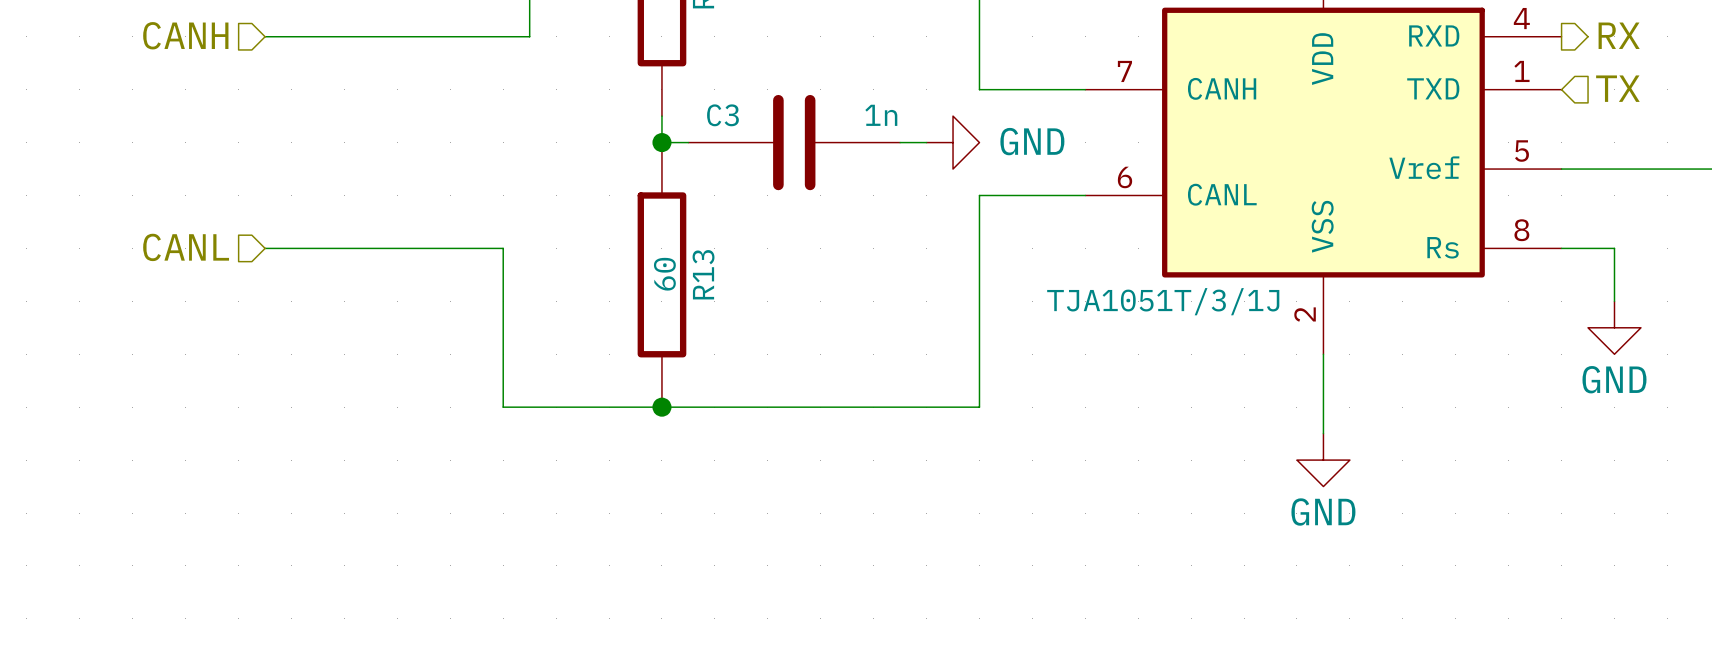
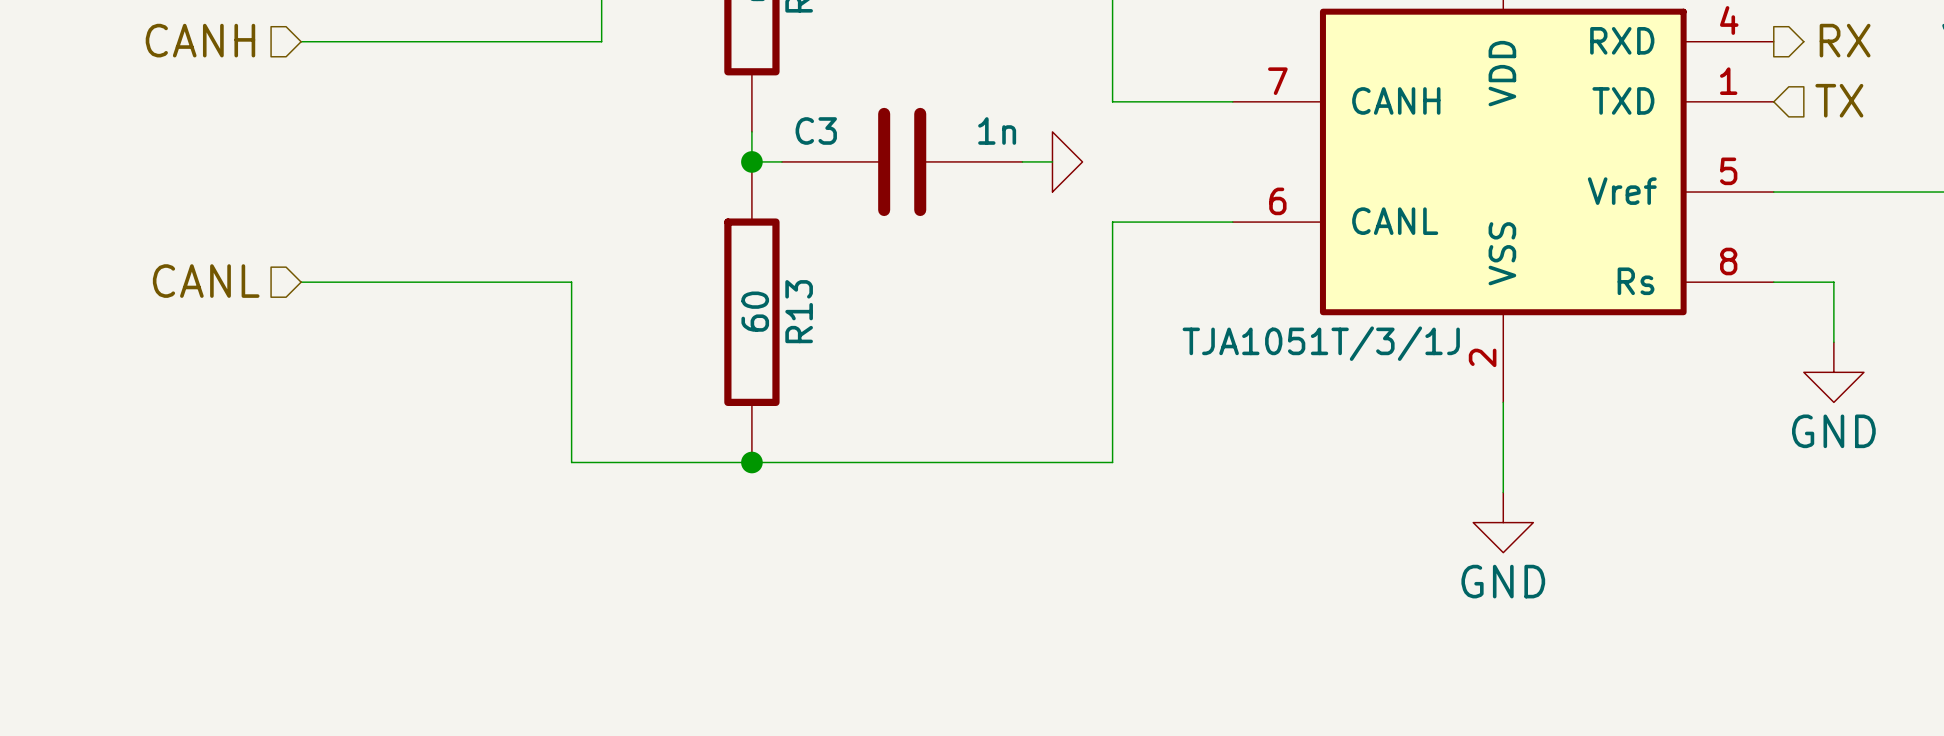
power symbol shape: [926, 116, 980, 170] -> [1052, 131, 1083, 193]
power symbol text: GND (1032, 141) -> none

